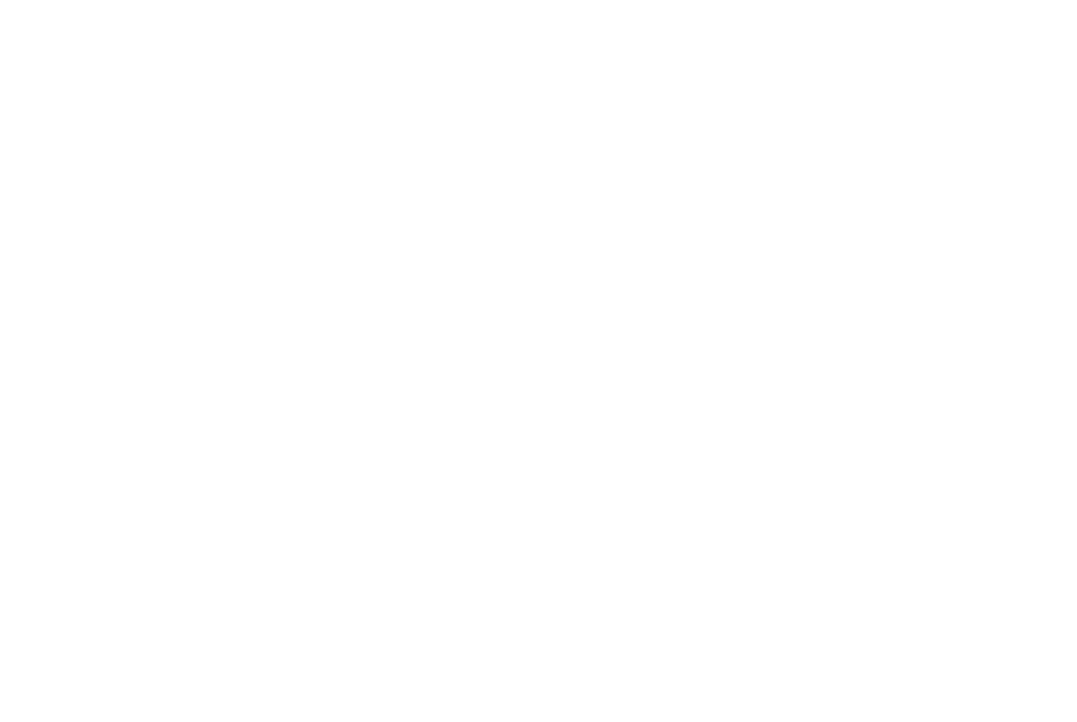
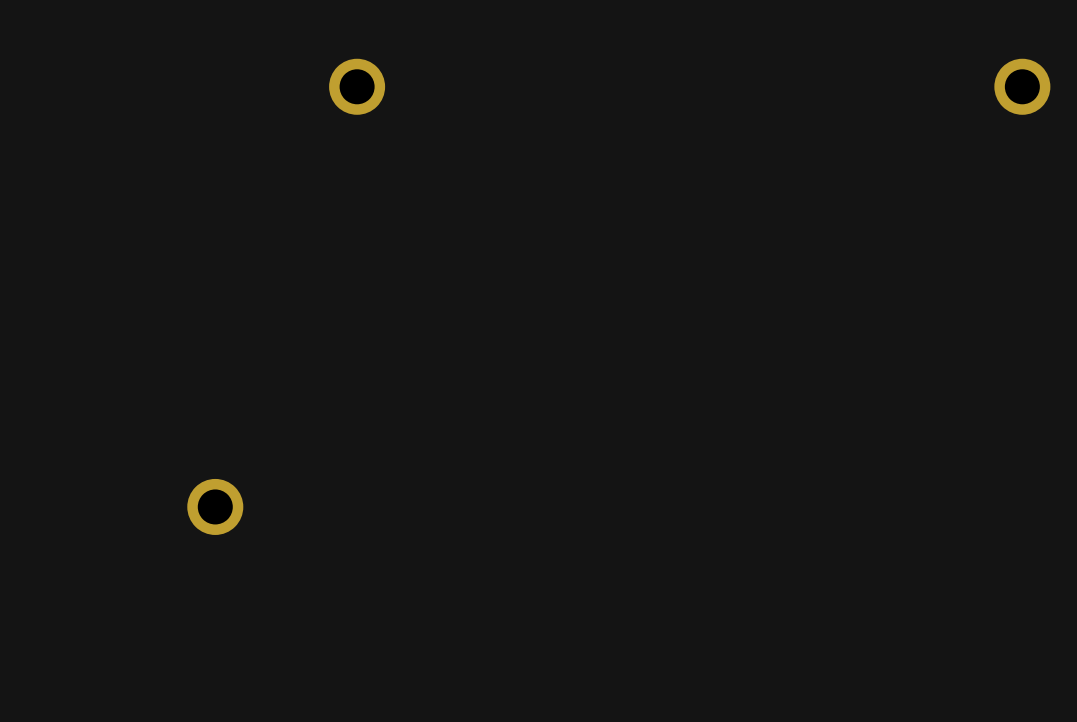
via: none -> (357, 86)
via: none -> (1022, 86)
via: none -> (215, 506)

